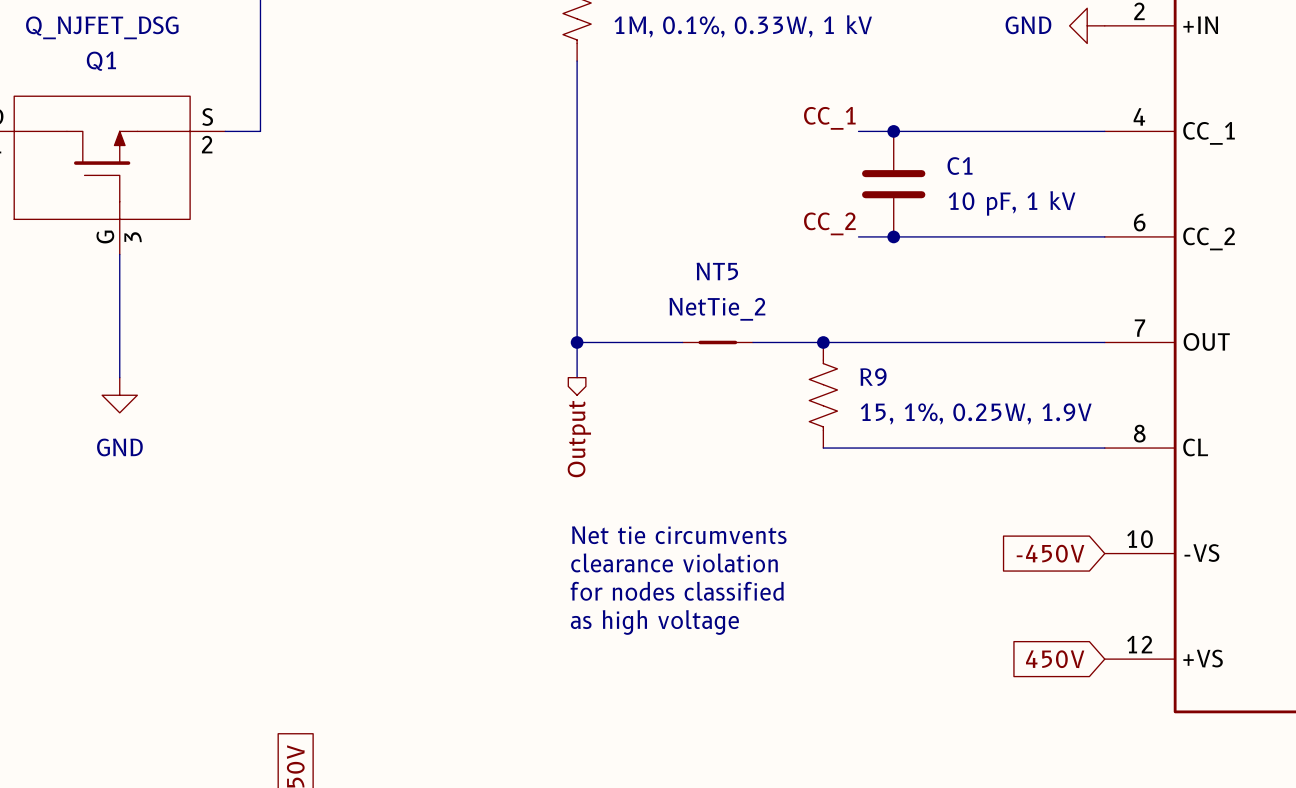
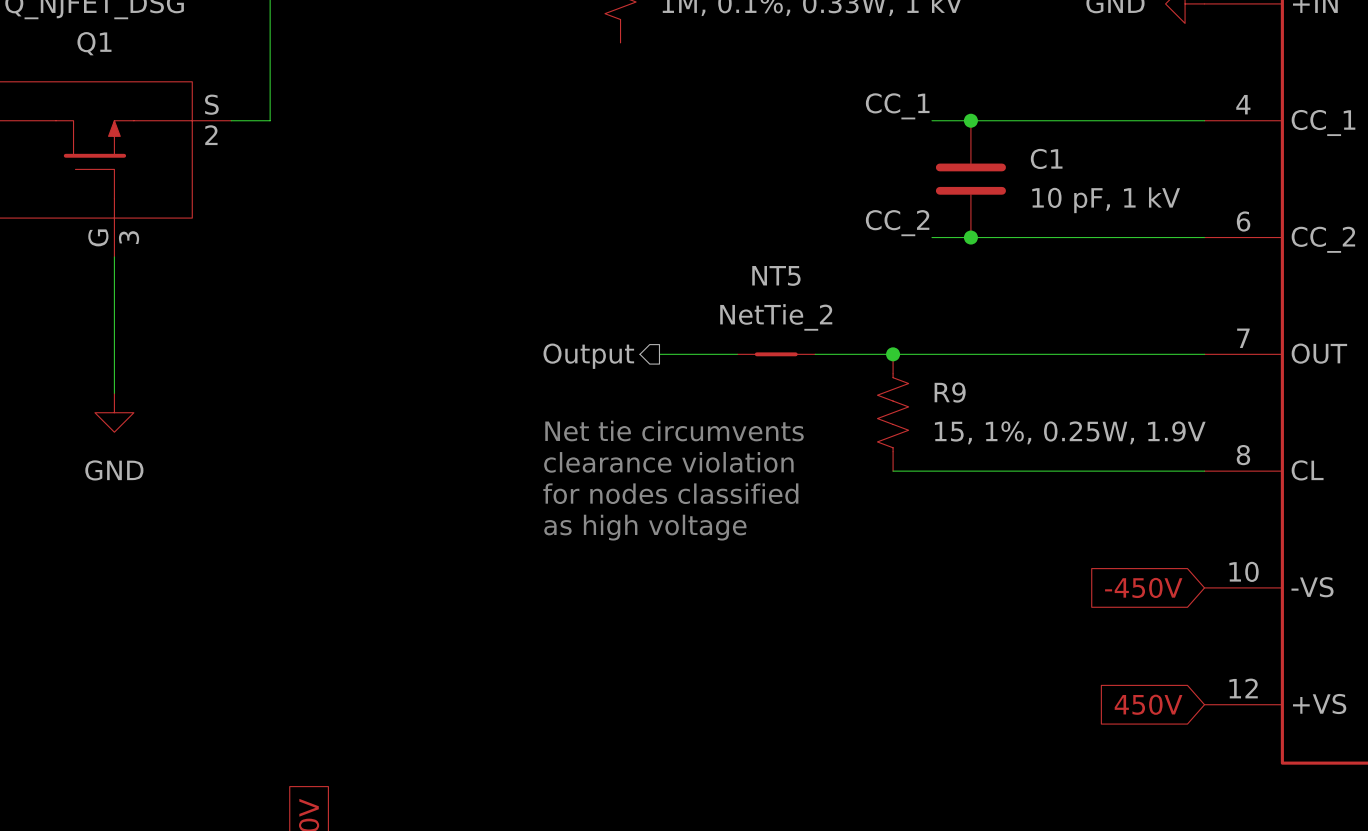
wire: (577, 61) (577, 377) -> none
wire: (577, 342) (612, 342) -> none
junction: (577, 342) -> none
hierarchical label rotation: 0° (579, 439) -> 90° clockwise (588, 356)
hierarchical label position: Output (579, 439) -> Output (588, 356)
text position: Net tie circumvents (679, 535) -> Net tie circumvents (674, 431)
text position: clearance violation (674, 562) -> clearance violation (668, 462)
text position: for nodes classified (677, 591) -> for nodes classified (670, 493)
text position: as high voltage (654, 622) -> as high voltage (645, 527)

